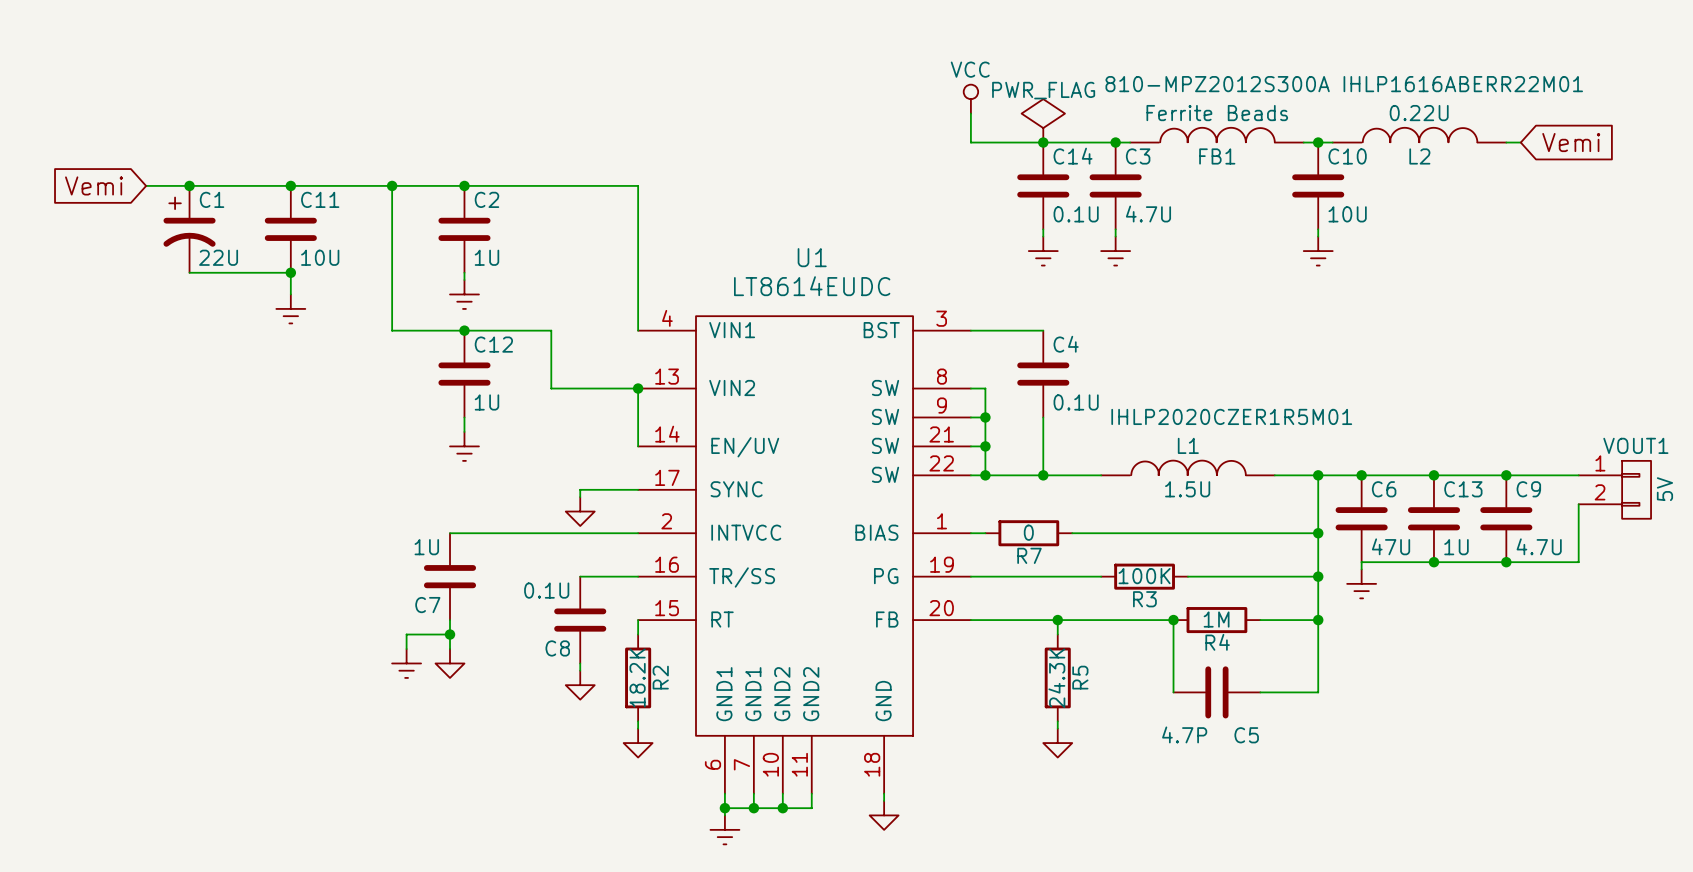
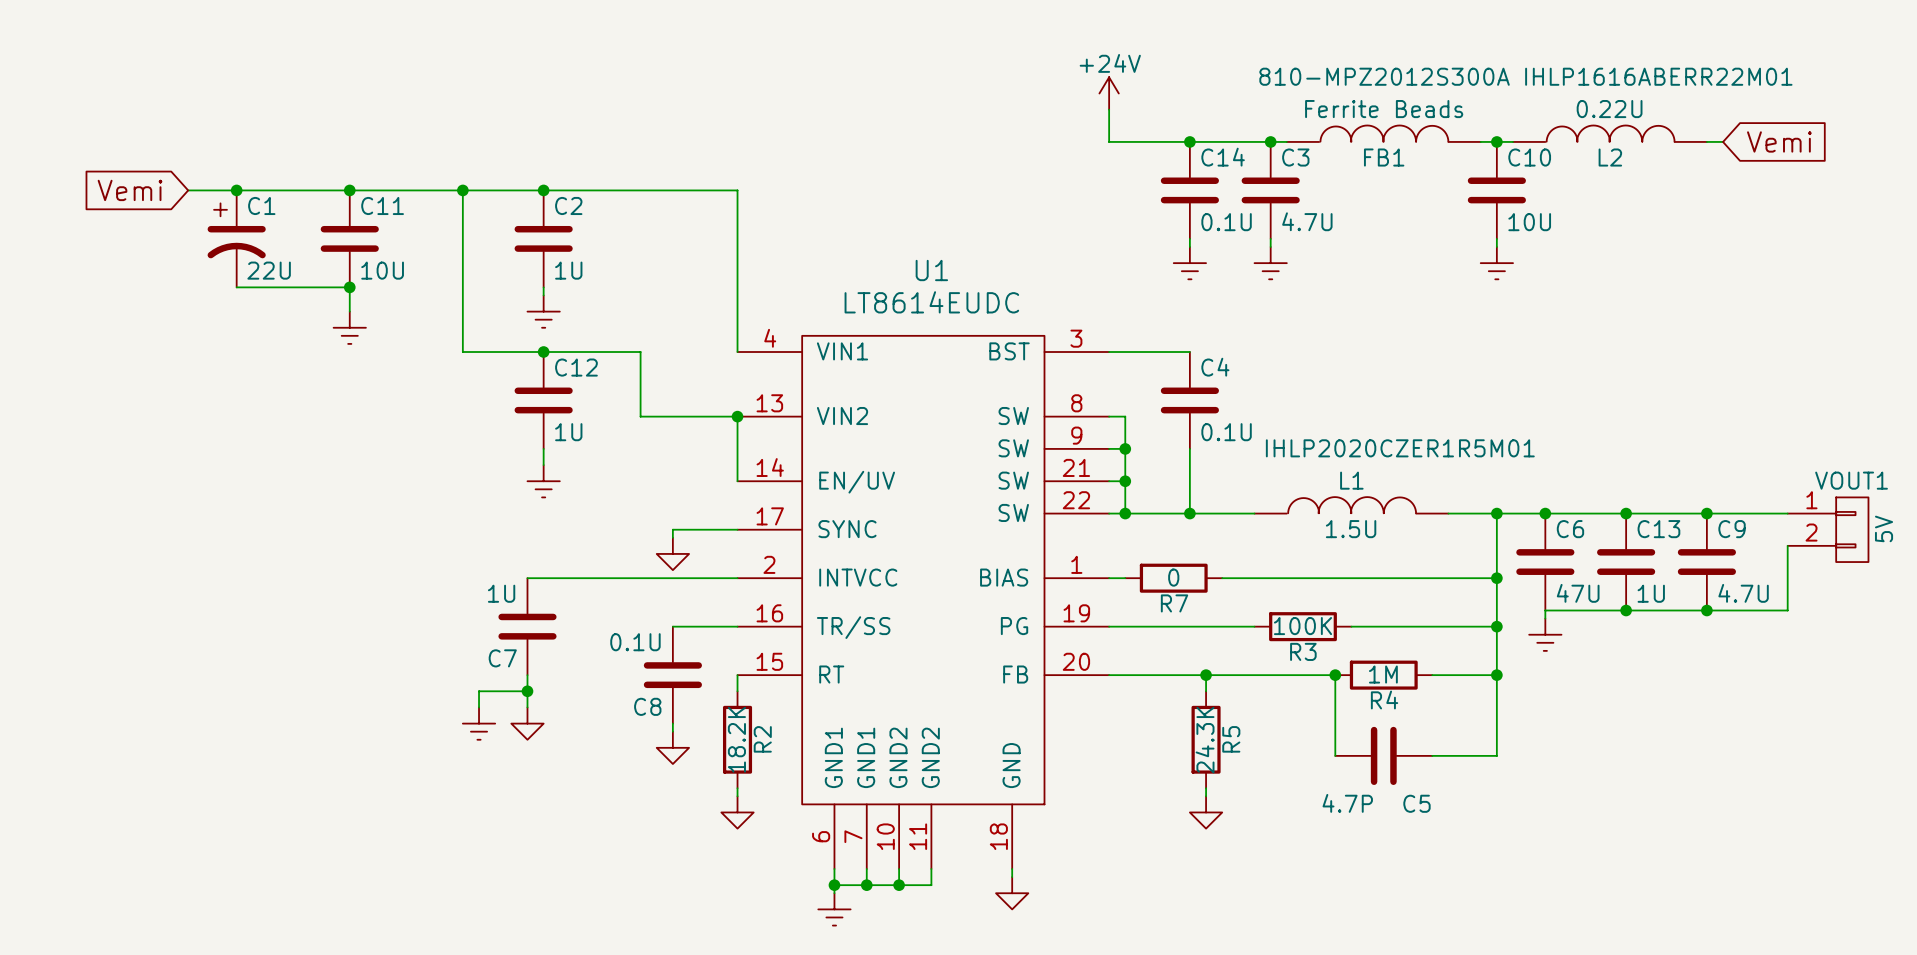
power symbol: VCC (970, 99) -> +24V (1109, 93)
power symbol: PWR_FLAG (1043, 120) -> none

